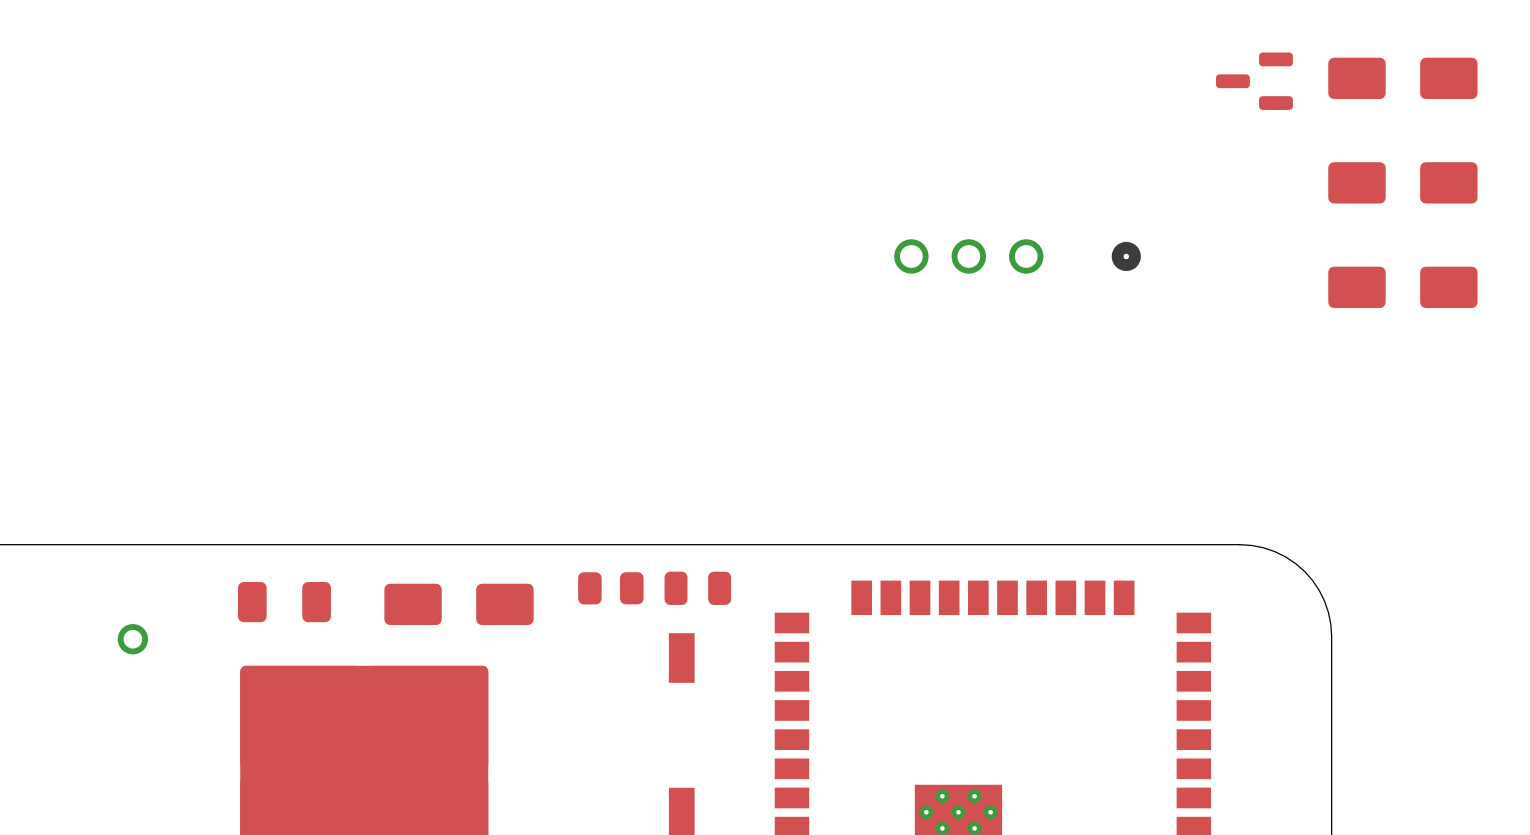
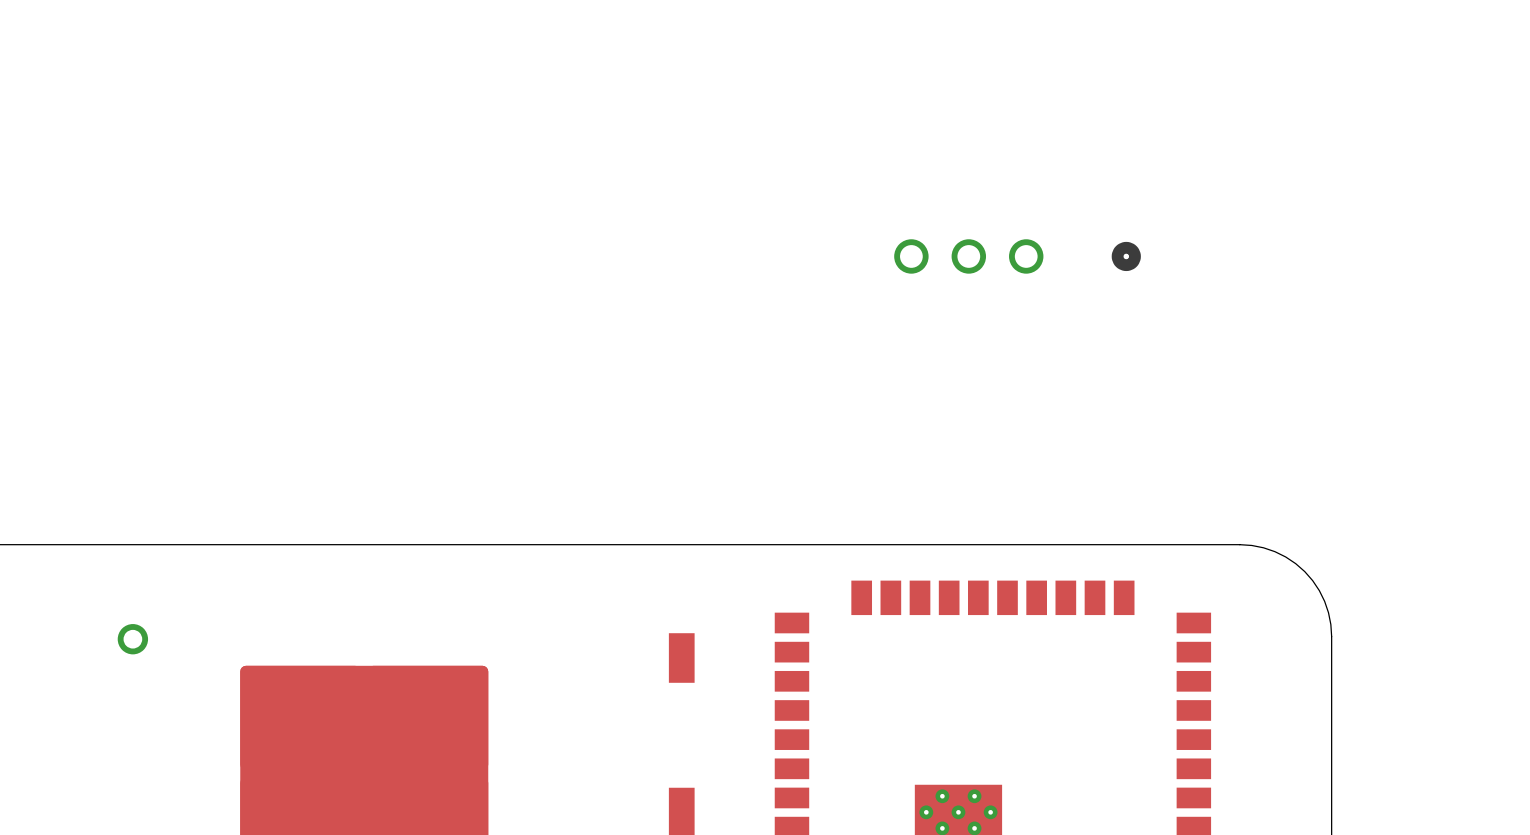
part: (1402, 78) -> none
part: (1254, 81) -> none
part: (1402, 182) -> none
part: (1402, 287) -> none
part: (610, 588) -> none
part: (697, 588) -> none
part: (284, 602) -> none
part: (458, 604) -> none

